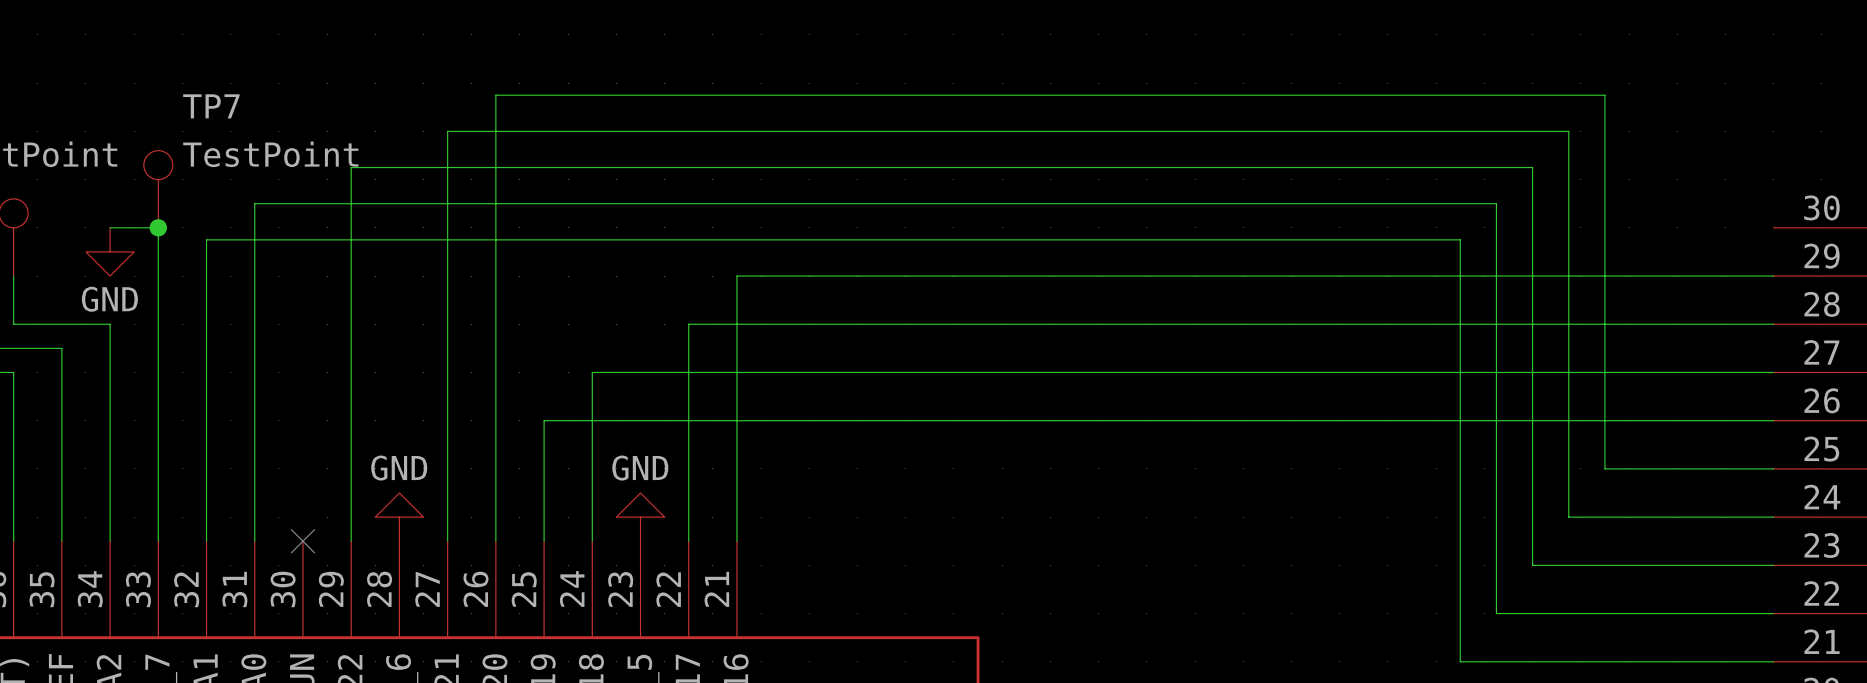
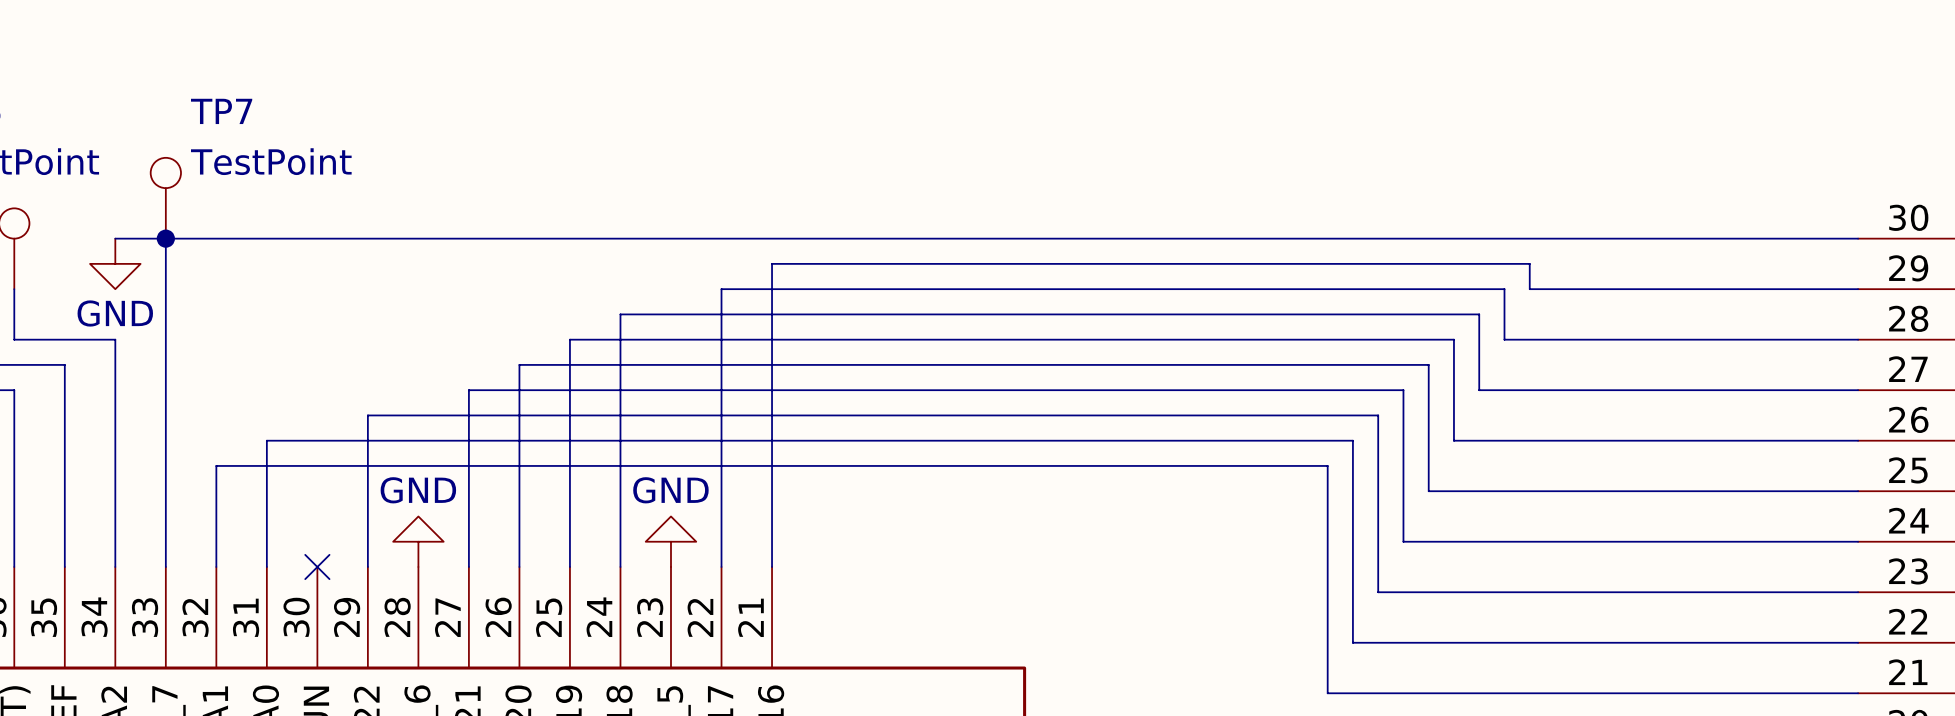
wire: none -> (165, 238) (1858, 238)
wire: (1460, 251) (1460, 239) (206, 239) (206, 444) -> (1529, 263) (772, 263) (772, 289) (721, 289) (721, 339) (569, 339) (569, 440) (266, 440)
wire: (1436, 276) (1460, 276) (1460, 661) -> (216, 465) (1327, 465) (1327, 693) (1529, 693)
wire: (1387, 324) (1436, 324) -> (1504, 289) (1504, 339)
wire: (495, 348) (495, 95) (1604, 95) (1604, 468) -> (519, 364) (1428, 364) (1428, 491) (1681, 491)
wire: (447, 372) (447, 131) (1568, 131) (1568, 517) -> (468, 390) (620, 390) (620, 314) (1479, 314) (1479, 390)
wire: (1339, 372) (1412, 372) -> (1403, 390) (1403, 541) (1643, 541)
wire: (351, 396) (351, 167) (1532, 167) (1532, 565) -> (367, 415) (1378, 415) (1378, 592) (1605, 592)
wire: (254, 420) (254, 203) (1496, 203) (1496, 613) -> (1352, 440) (1352, 642) (1567, 642)
wire: (1291, 420) (1387, 420) -> (1453, 339) (1453, 440)

